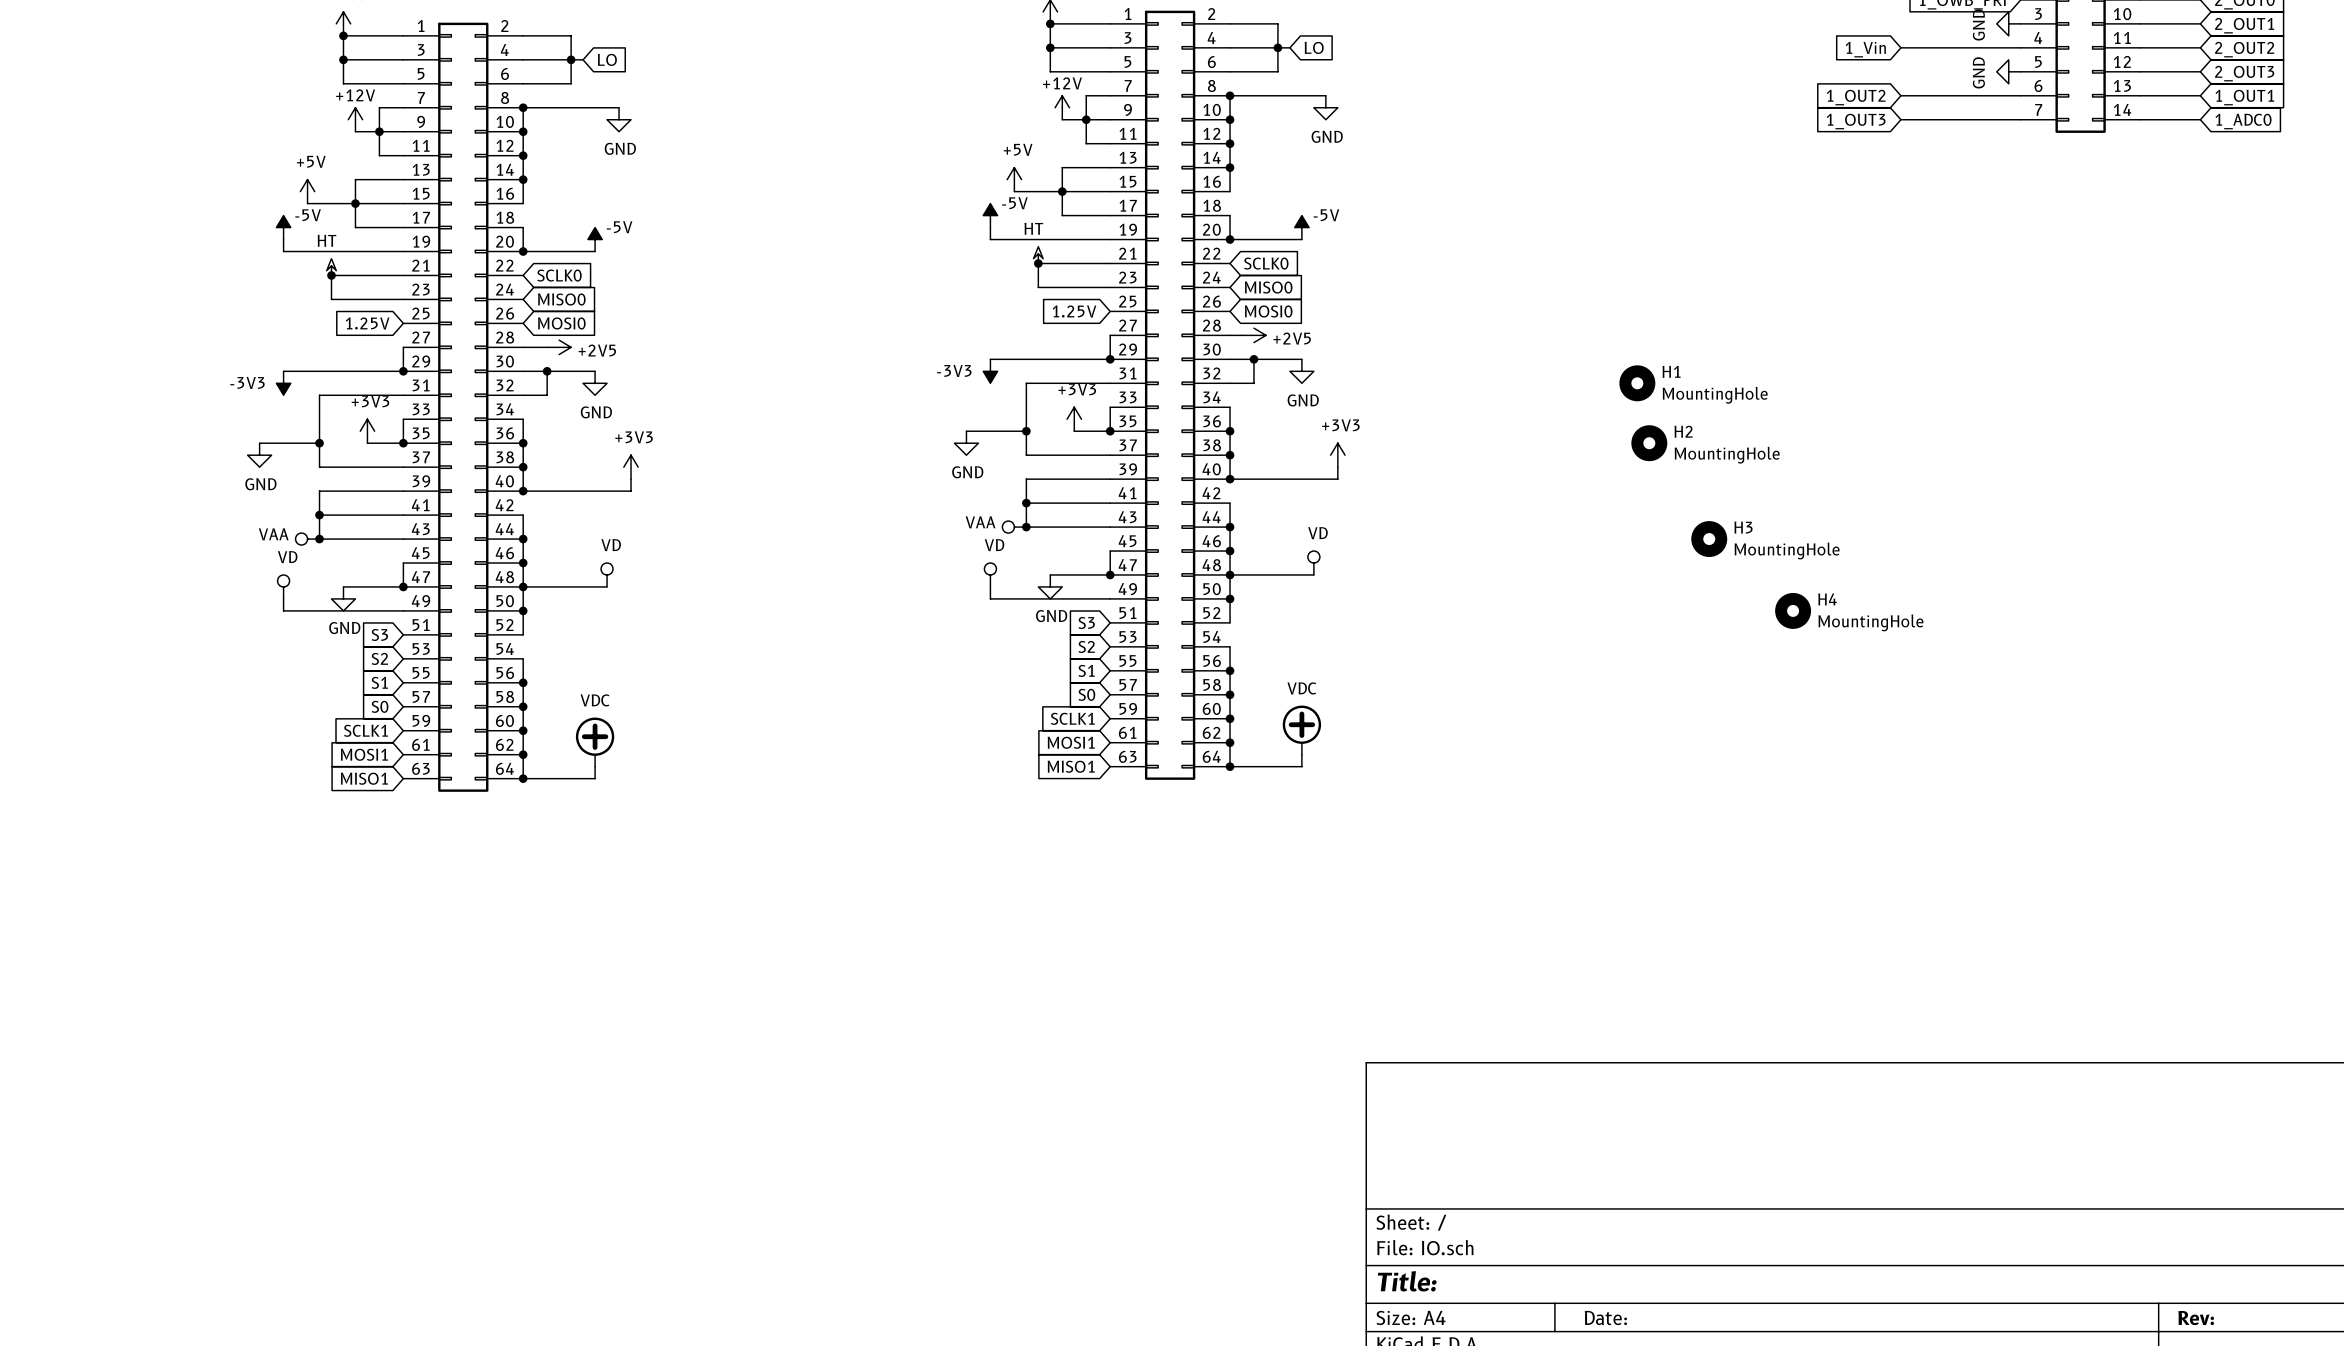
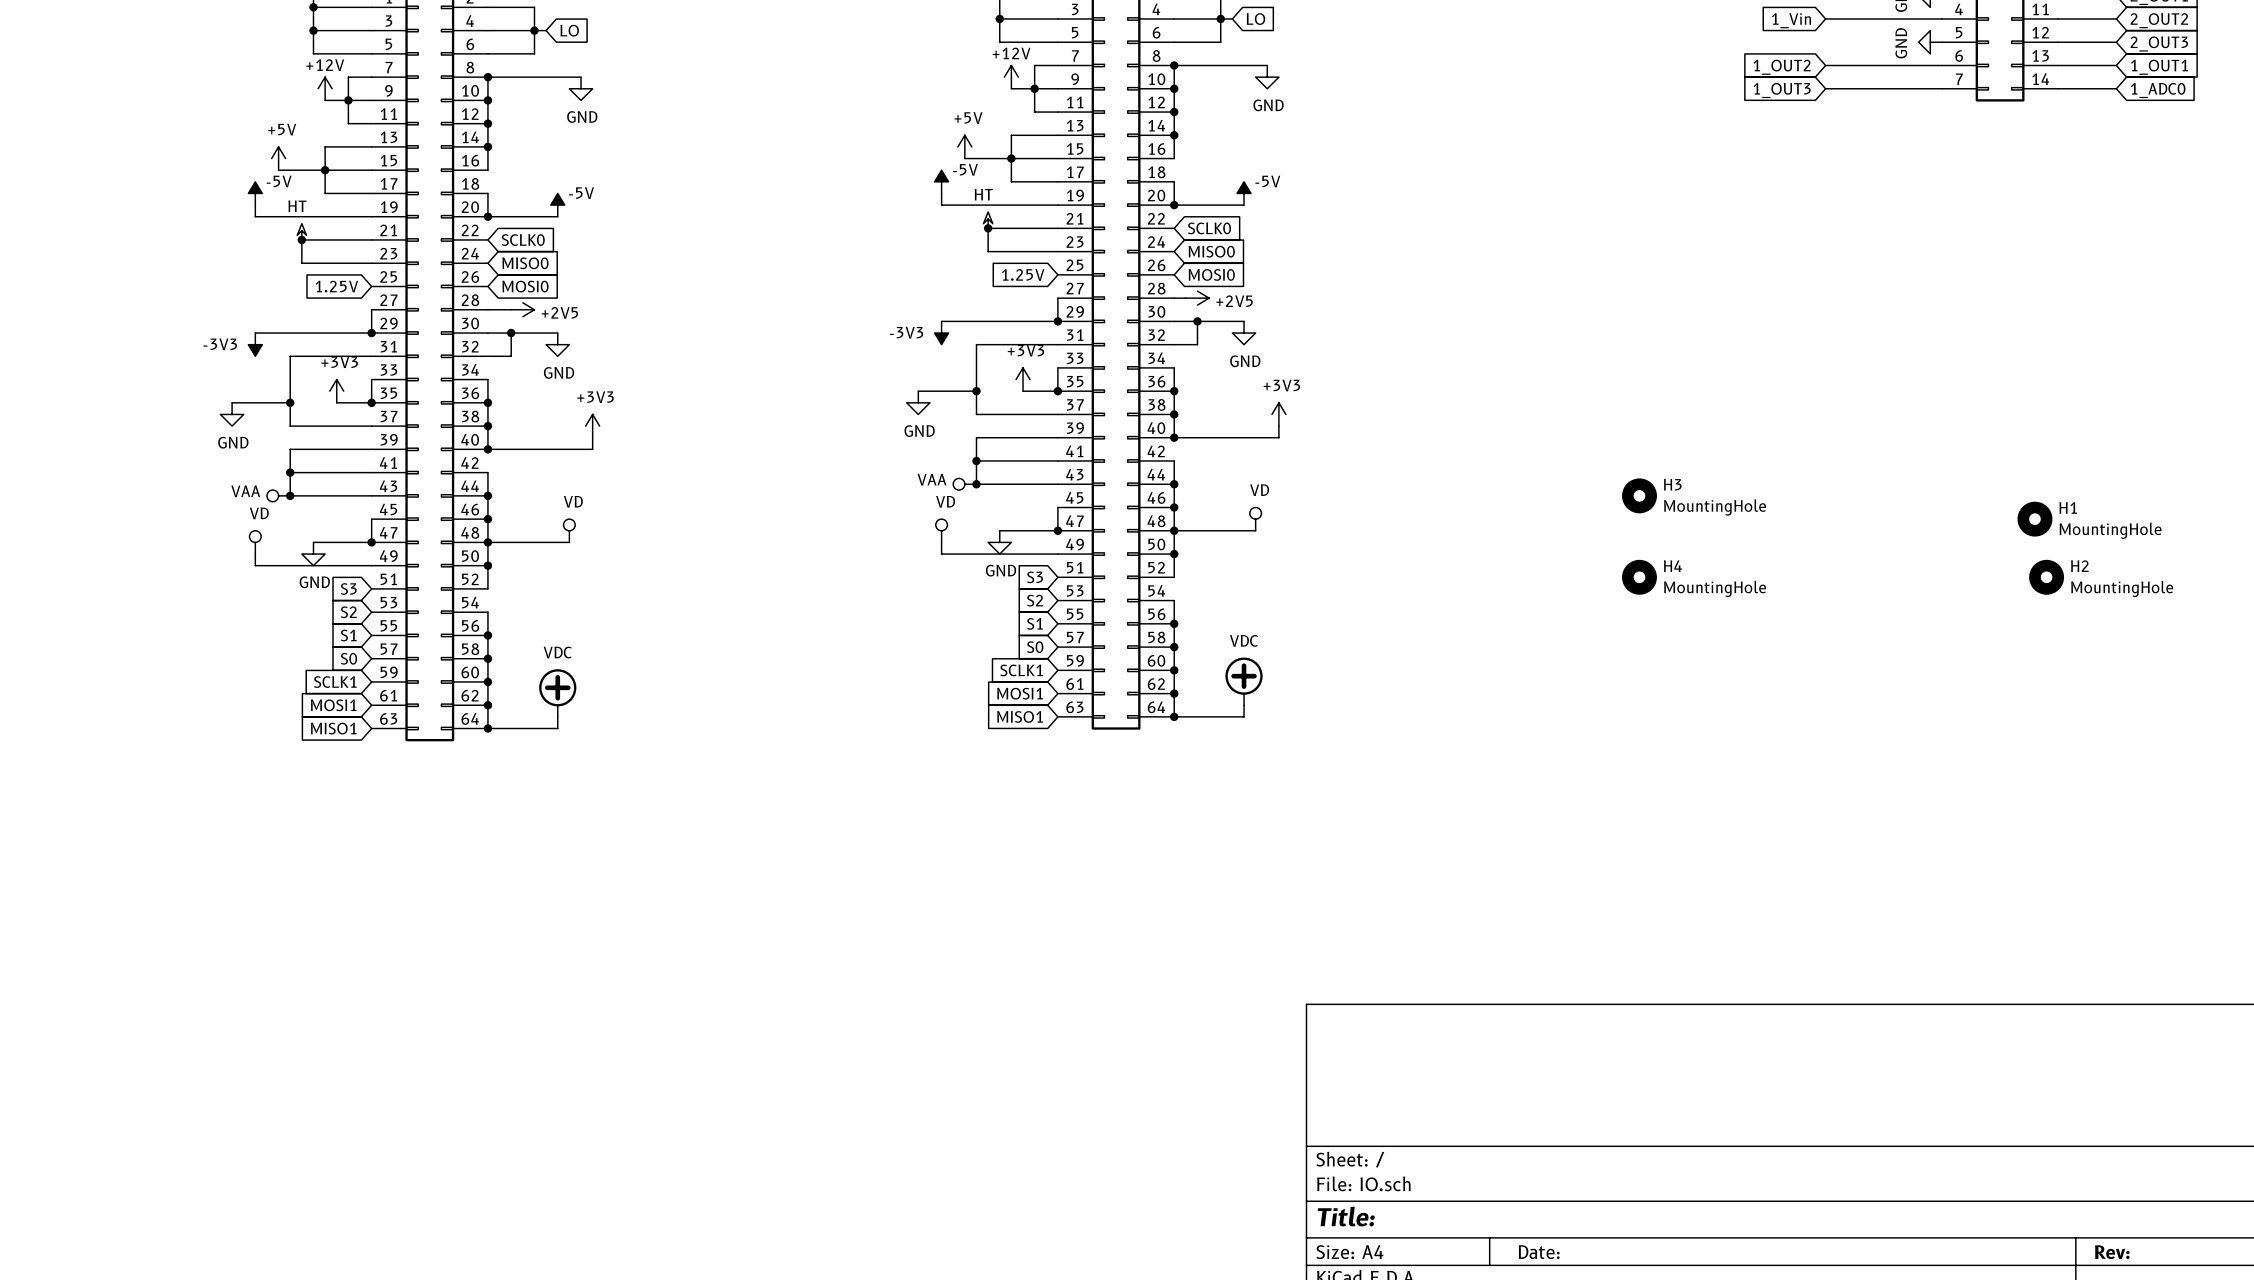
H1 position: (1637, 383) -> (2034, 519)
H2 position: (1649, 443) -> (2046, 577)
H4 position: (1793, 610) -> (1639, 577)

